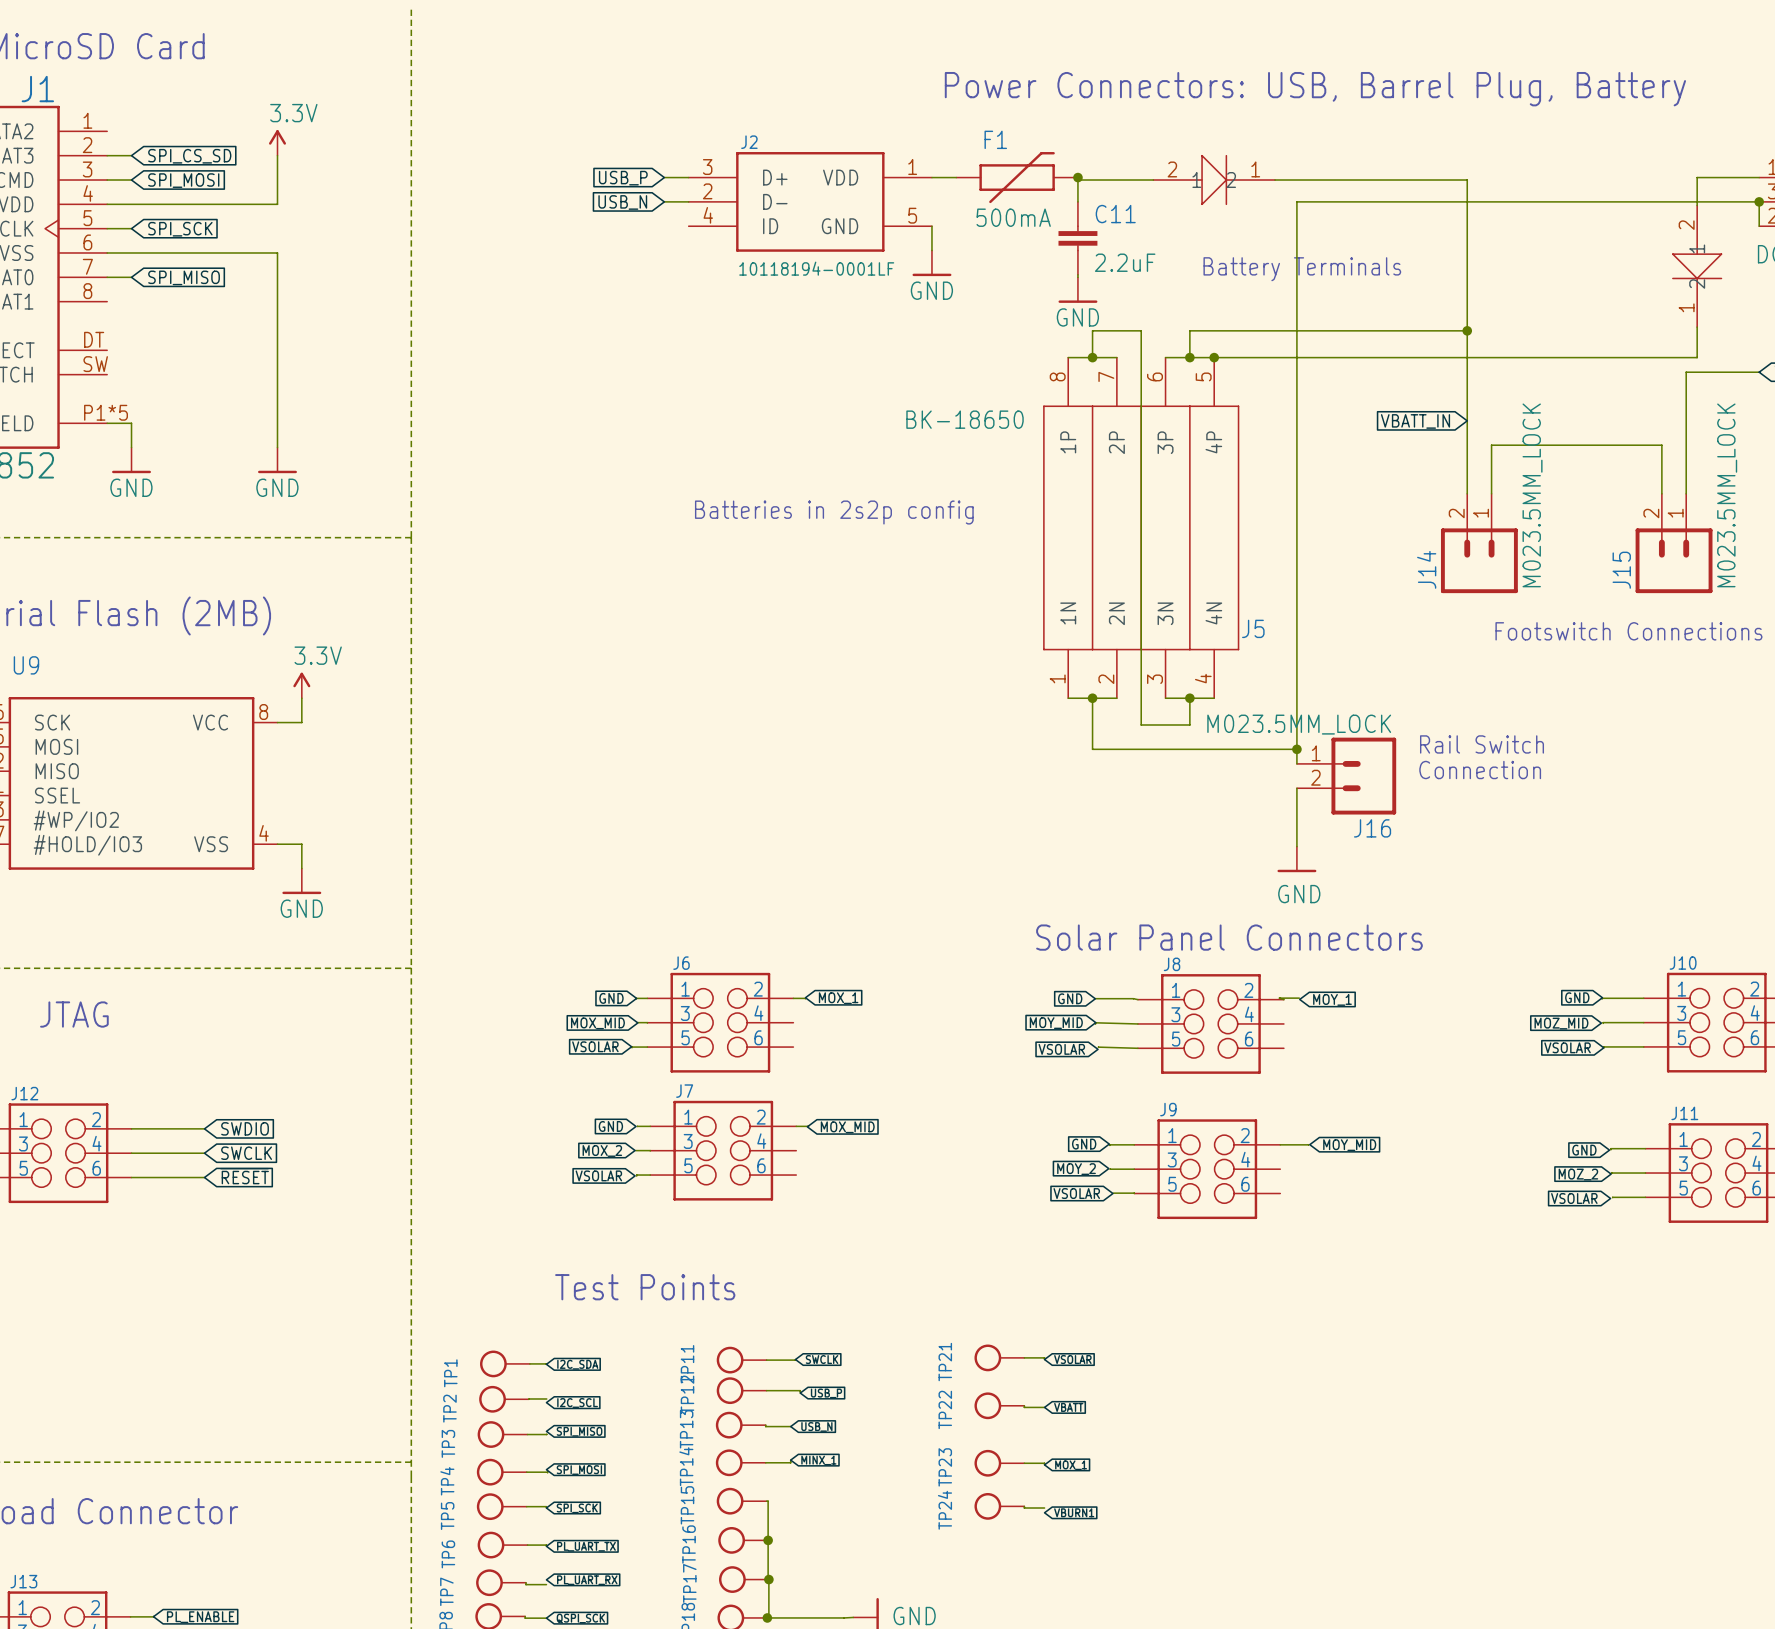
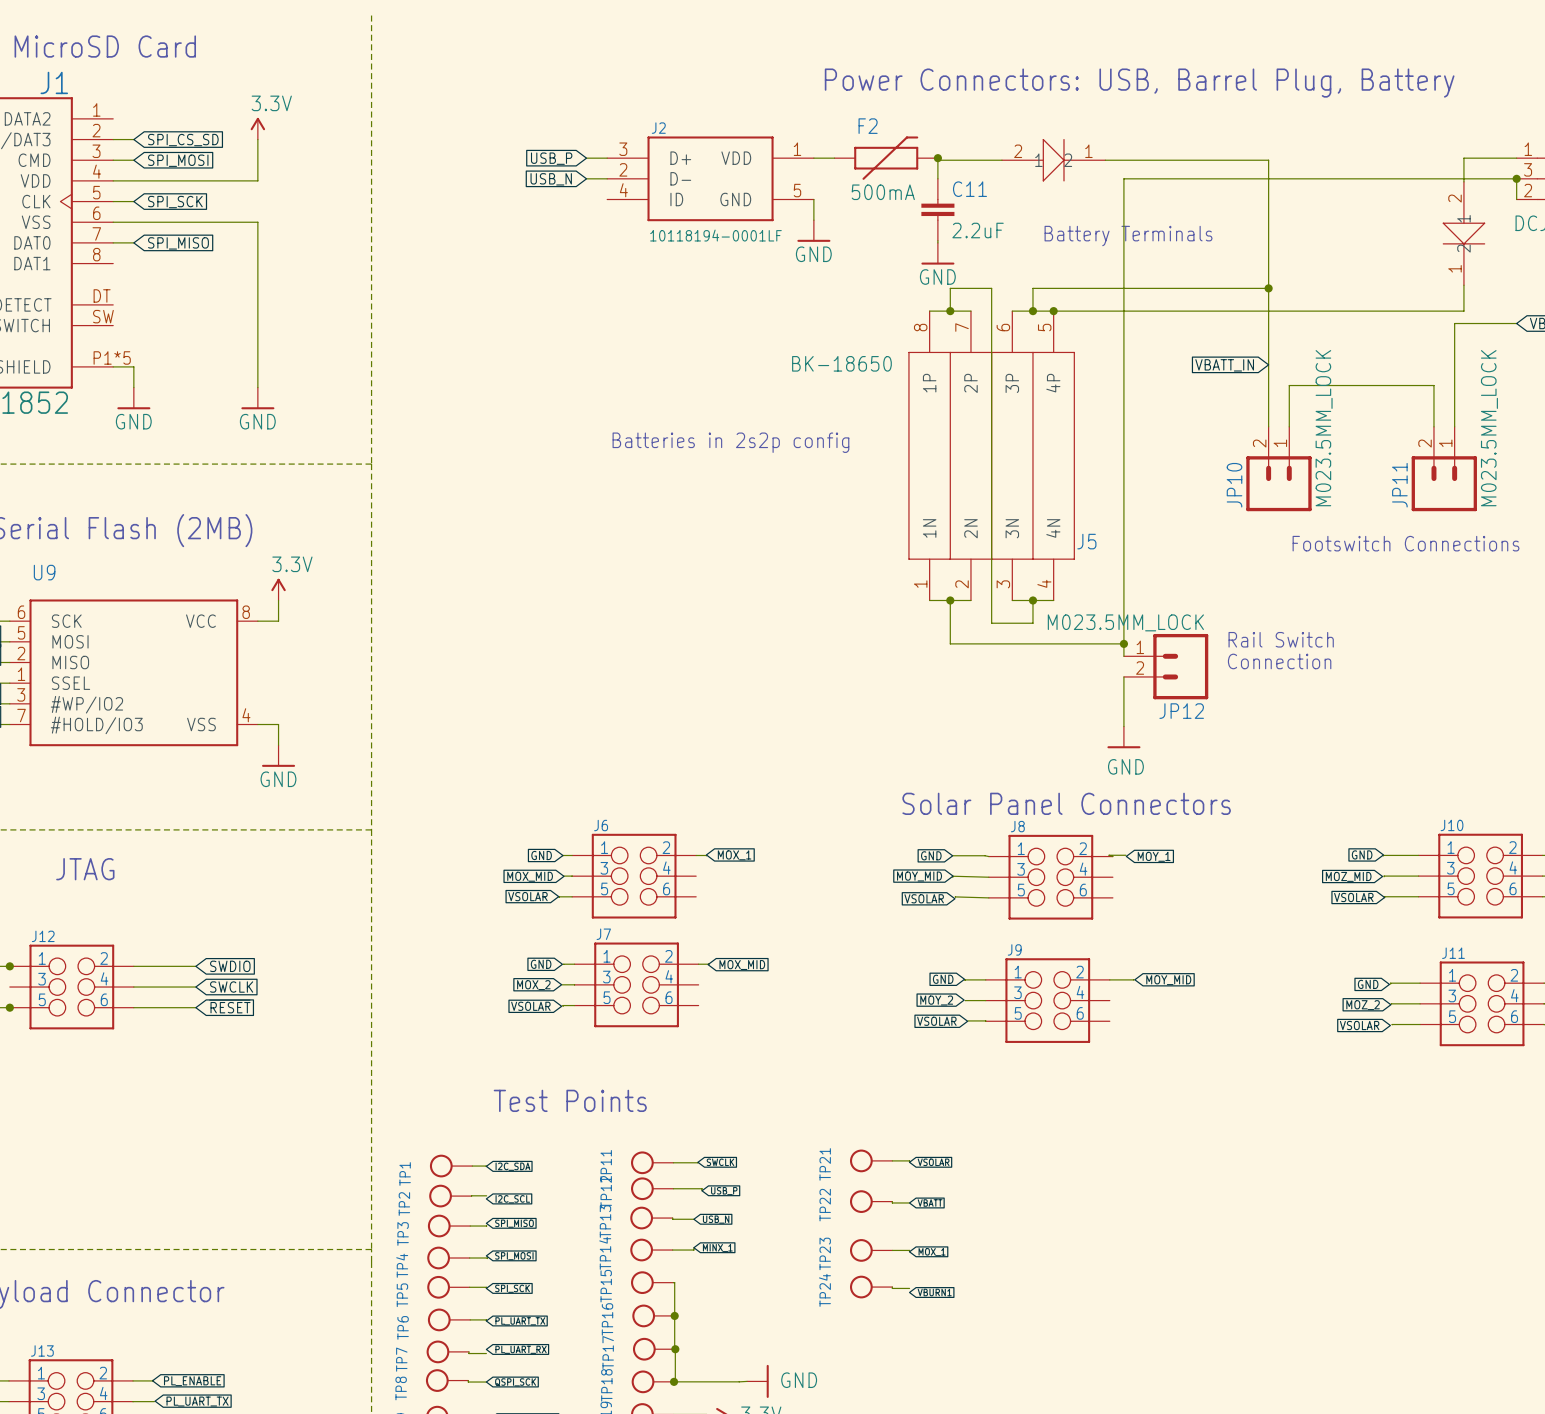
F1 name: F1 (995, 139) -> F2 (868, 126)
J14 name: J14 (1426, 569) -> JP10 (1234, 485)
J15 name: J15 (1621, 570) -> JP11 (1399, 485)
J16 name: J16 (1372, 828) -> JP12 (1181, 711)

